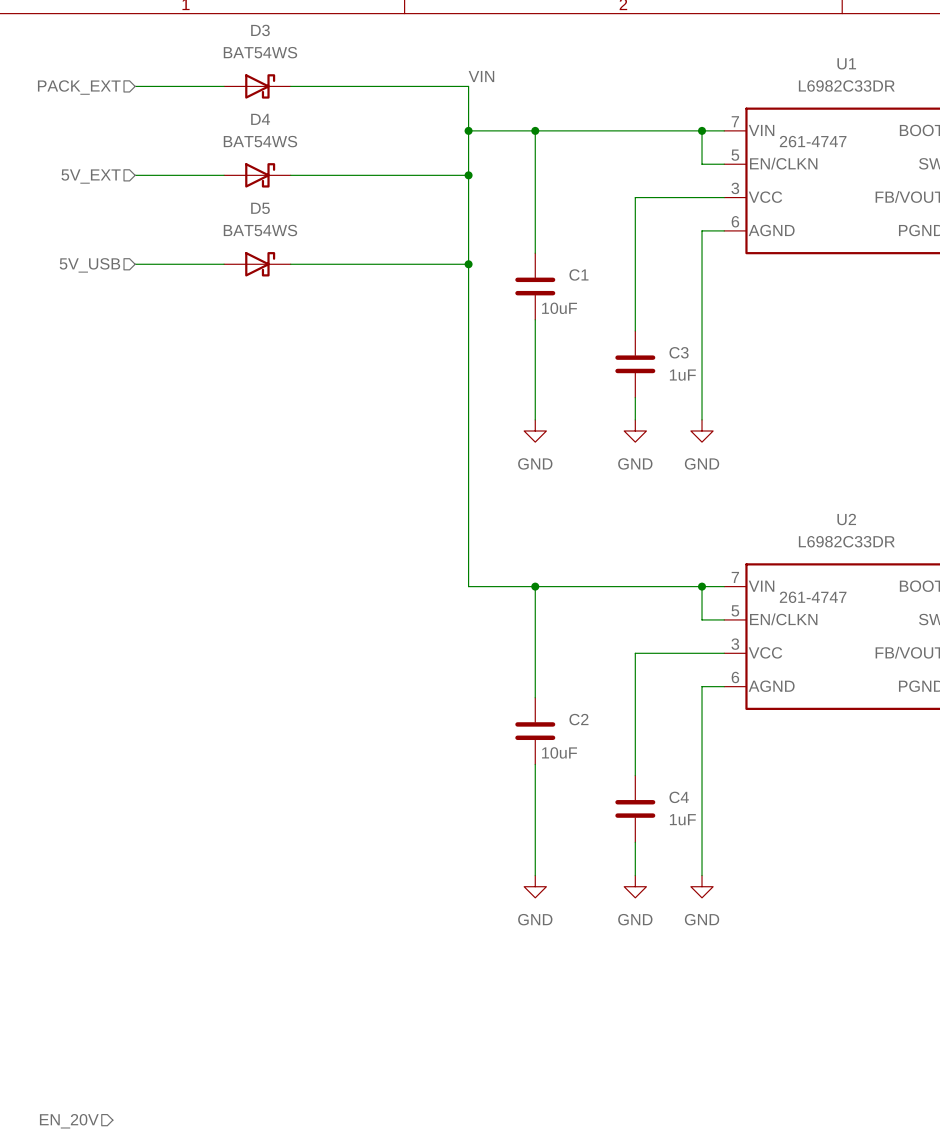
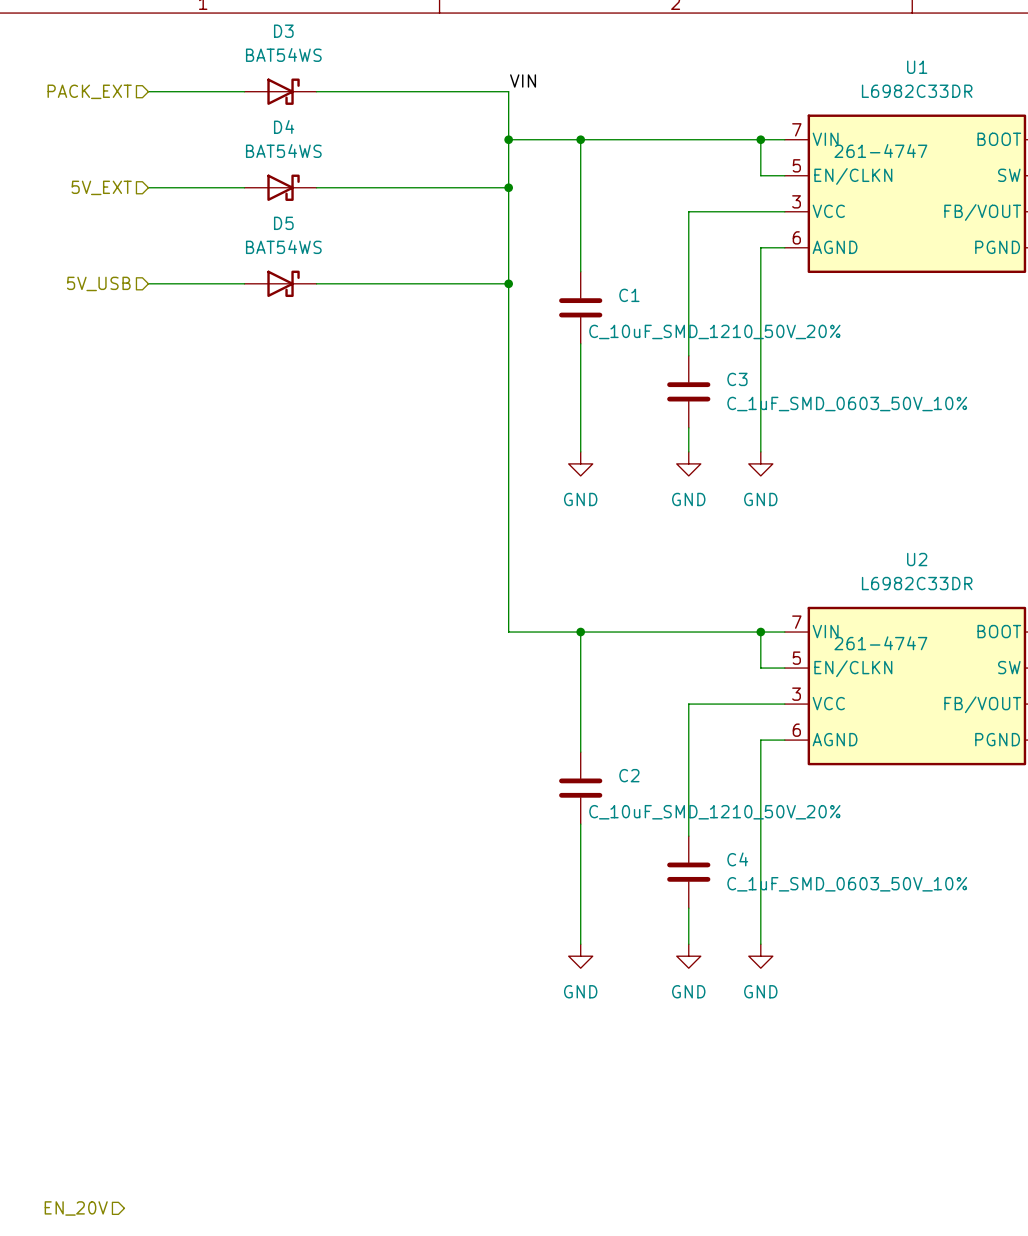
C1 value: 10uF (559, 308) -> C_10uF_SMD_1210_50V_20% (714, 331)
C3 value: 1uF (682, 375) -> C_1uF_SMD_0603_50V_10% (847, 404)
C2 value: 10uF (559, 752) -> C_10uF_SMD_1210_50V_20% (714, 812)
C4 value: 1uF (682, 819) -> C_1uF_SMD_0603_50V_10% (847, 884)

